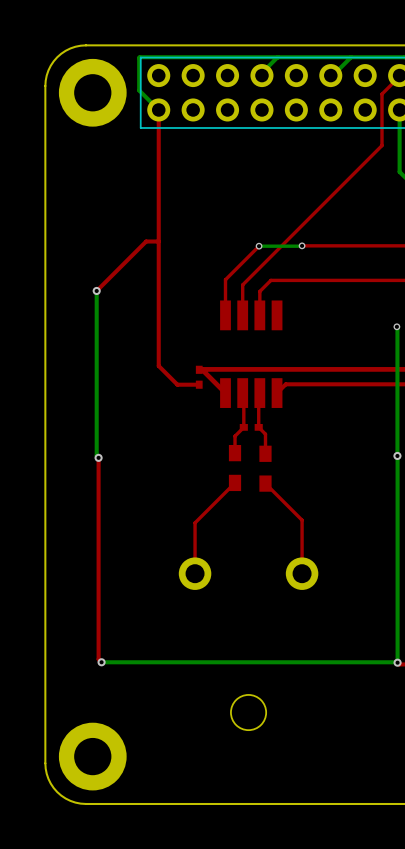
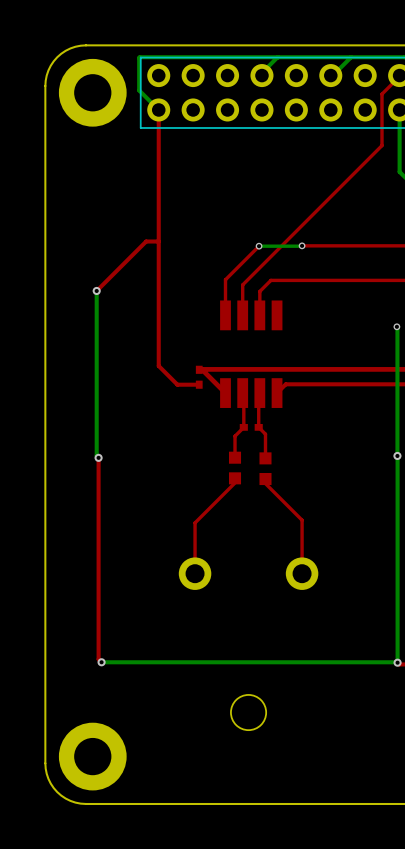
part footprint: [228, 444, 242, 492] -> [228, 451, 242, 485]
part footprint: [259, 445, 272, 492] -> [259, 452, 272, 486]

